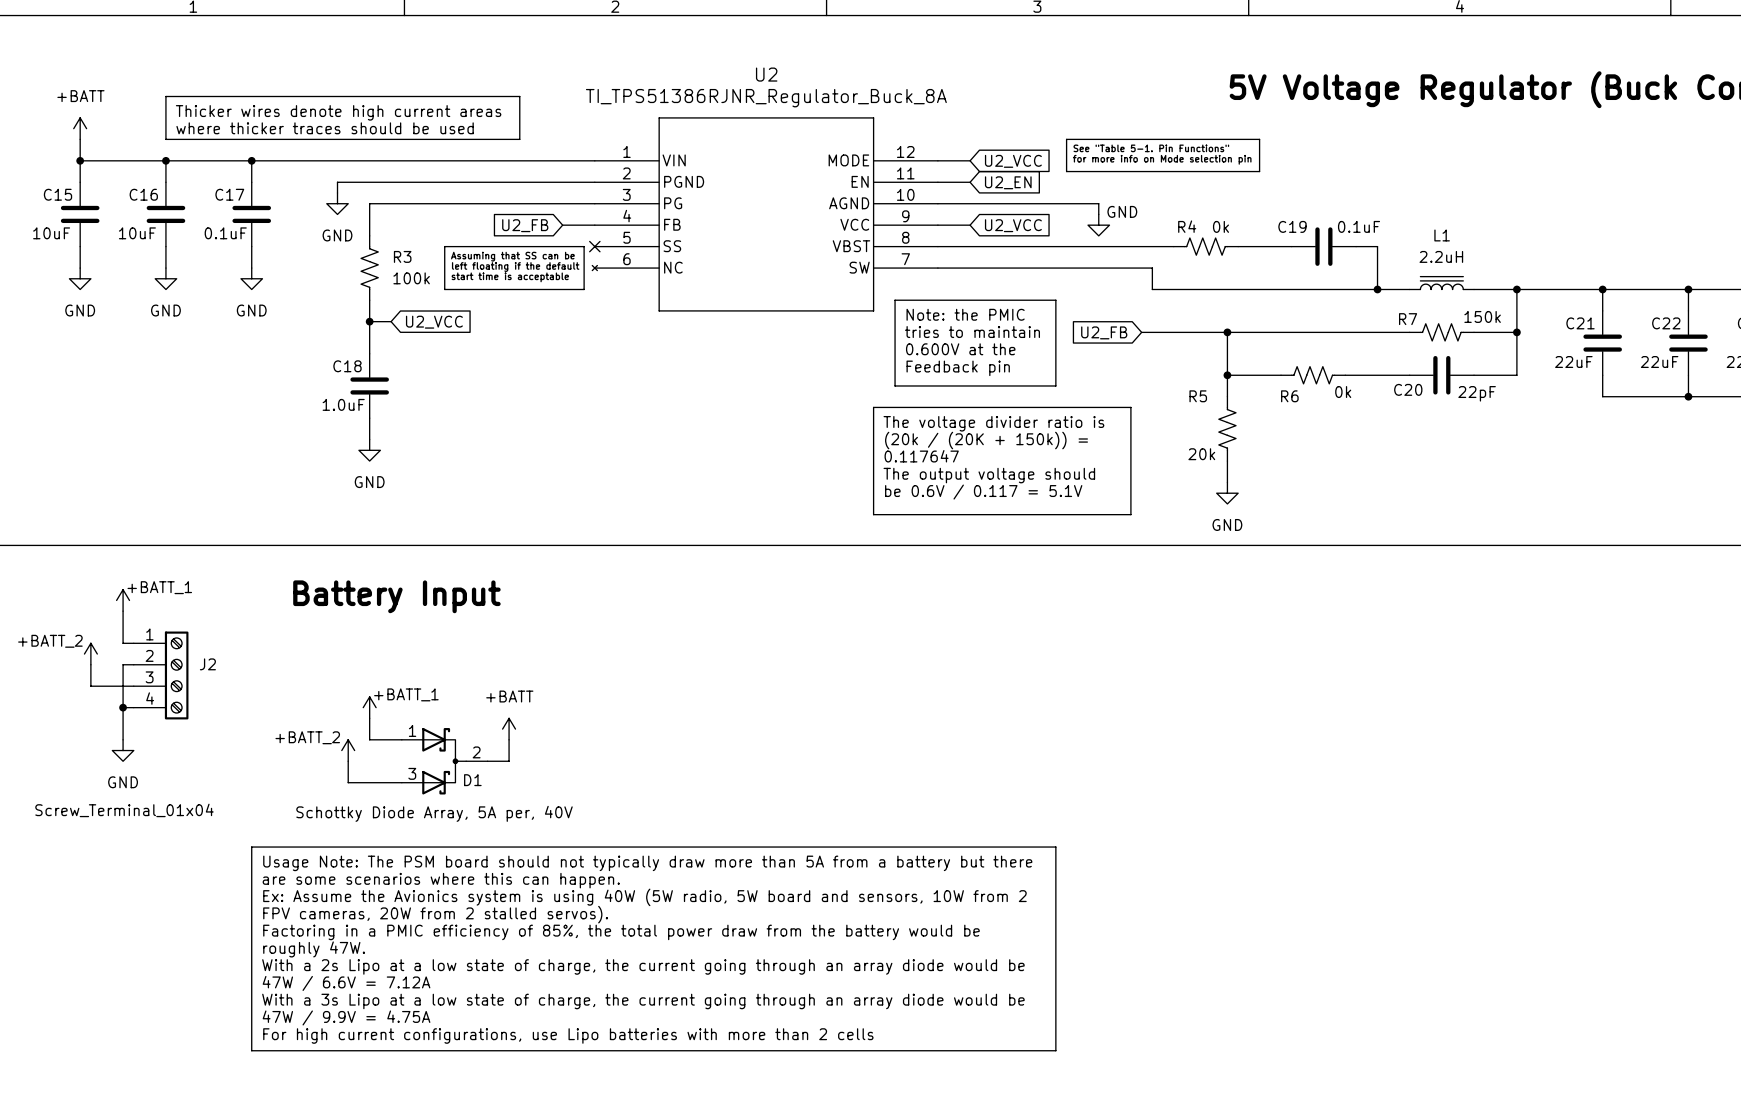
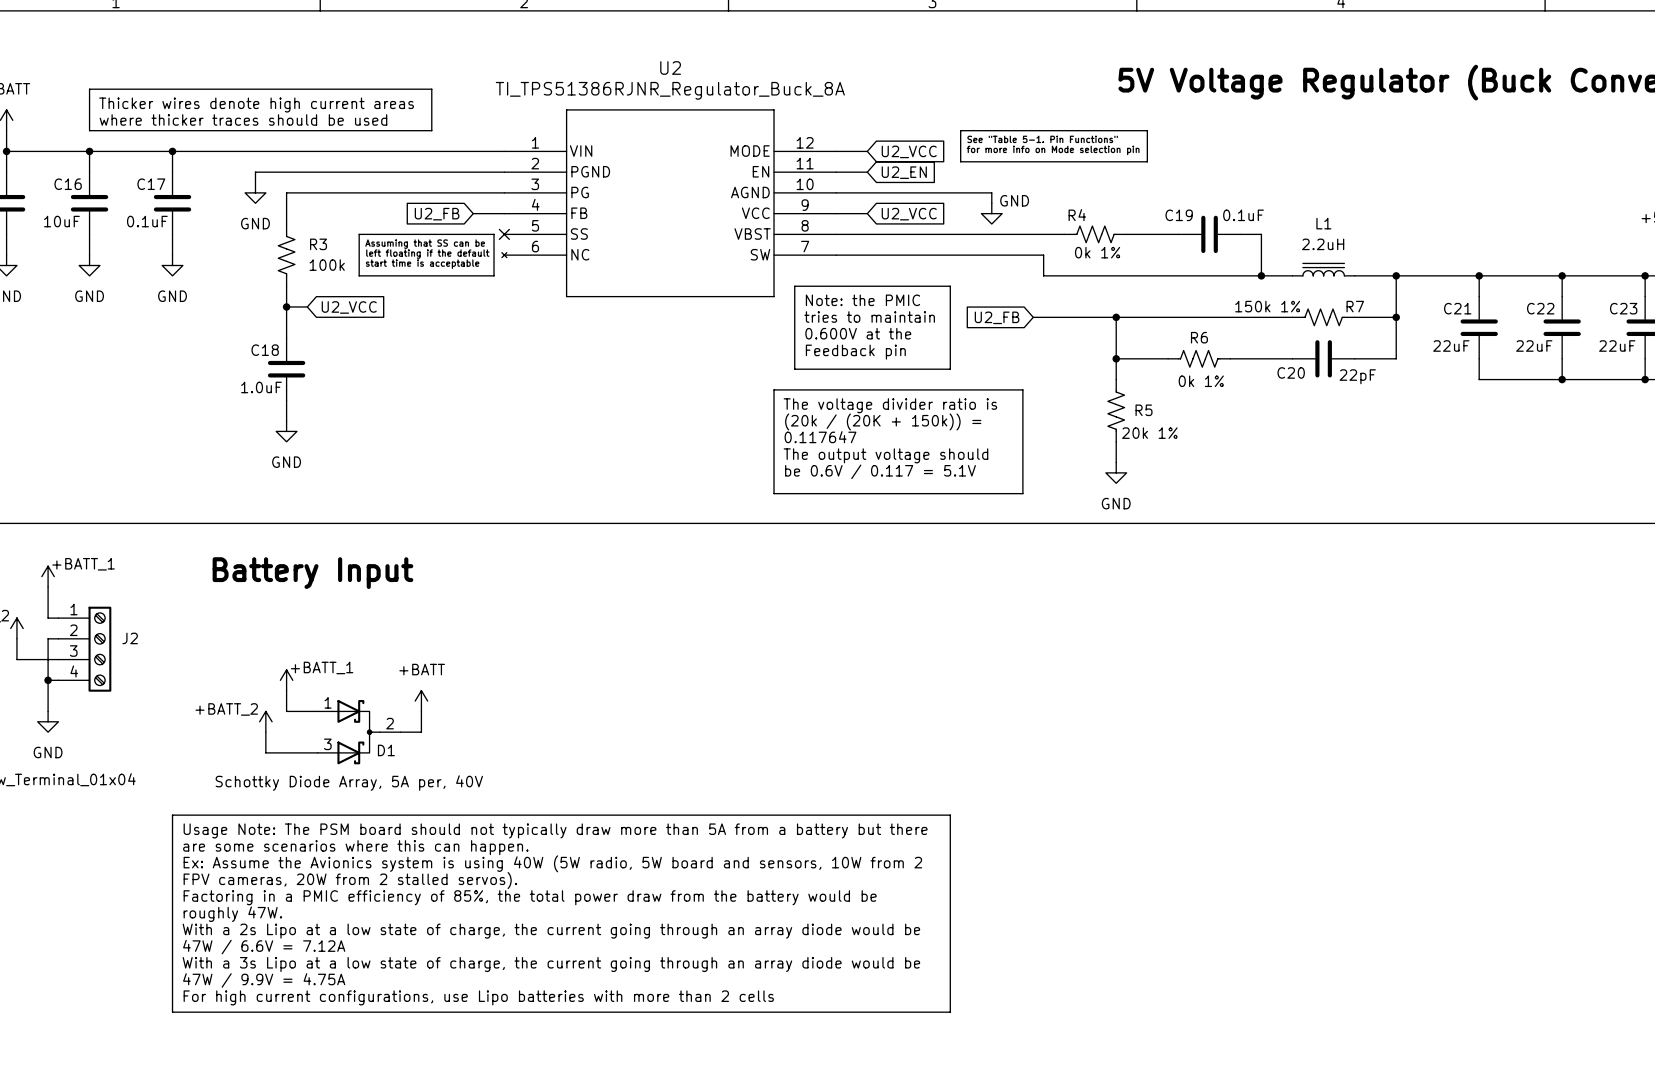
R4 value: 0k (1220, 226) -> 0k 1% (1097, 252)
R7 value: 150k (1482, 316) -> 150k 1% (1267, 306)
R7 name position: R7 (1408, 319) -> R7 (1355, 306)
R6 value: 0k (1343, 392) -> 0k 1% (1201, 381)
R5 name position: R5 (1198, 396) -> R5 (1144, 410)
R6 name position: R6 (1289, 396) -> R6 (1199, 337)
R5 value: 20k (1201, 454) -> 20k 1% (1149, 433)

